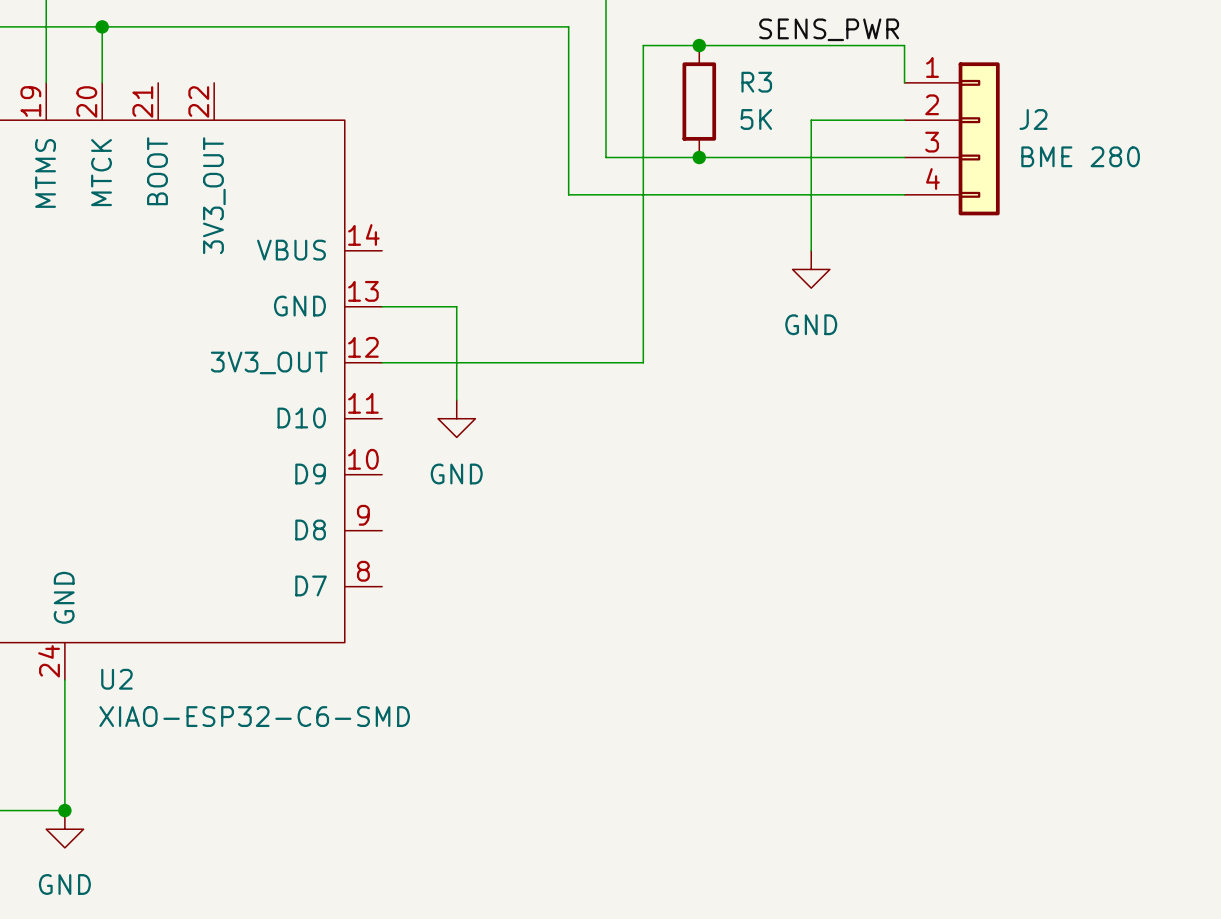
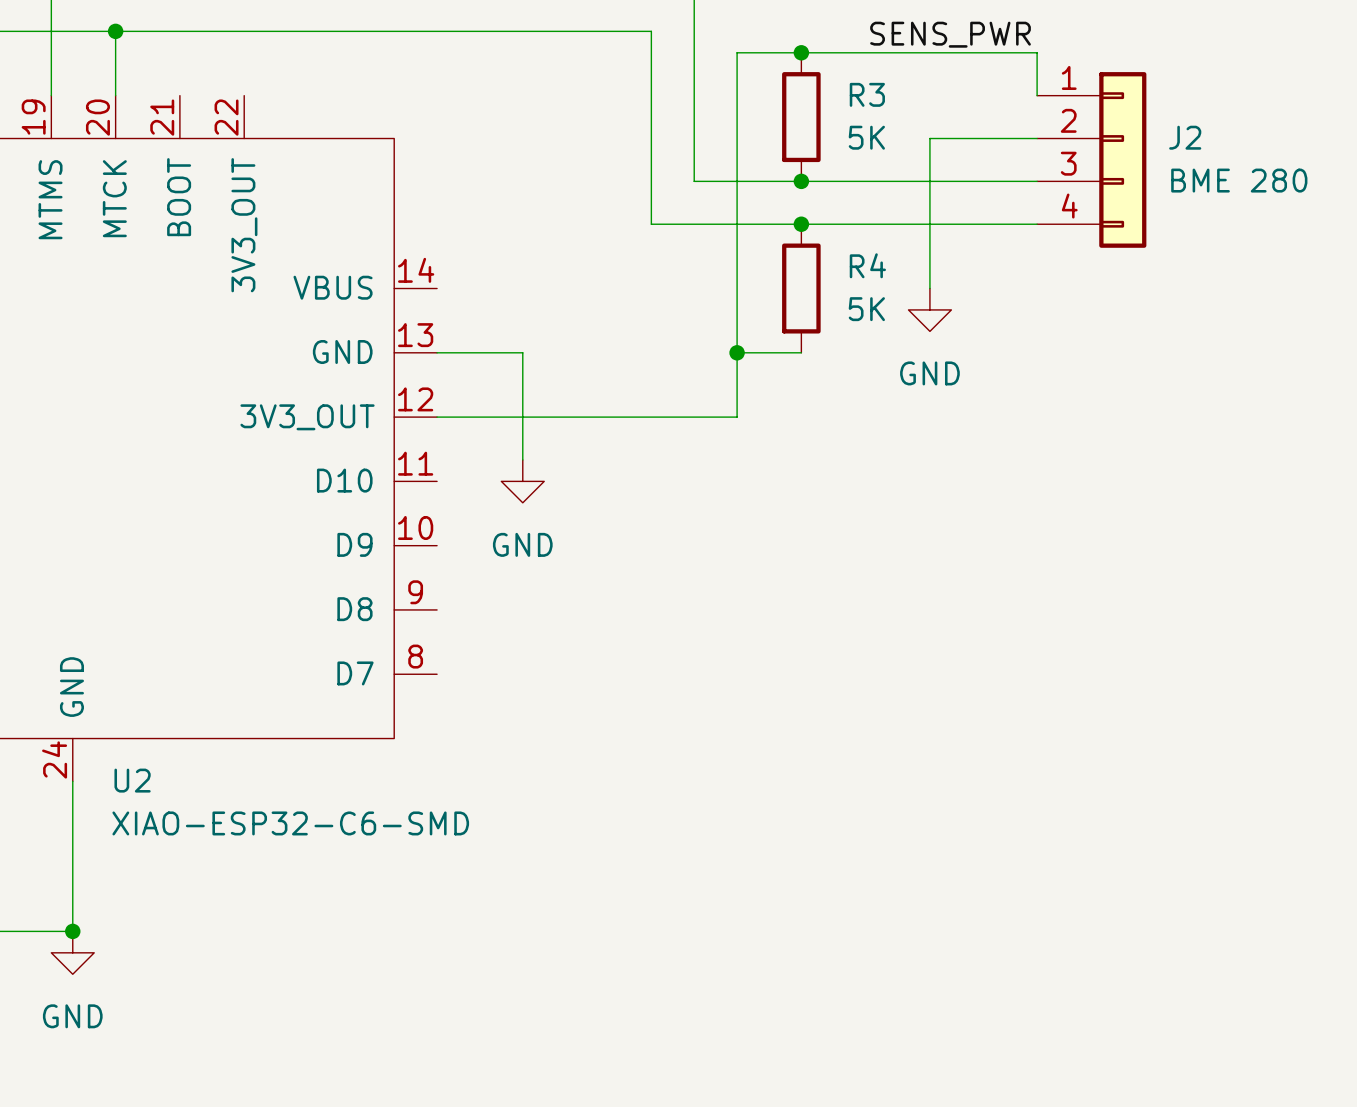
junction: none -> (801, 224)
R4: none -> 5K (801, 288)
wire: none -> (737, 352) (801, 352)
junction: none -> (737, 352)

